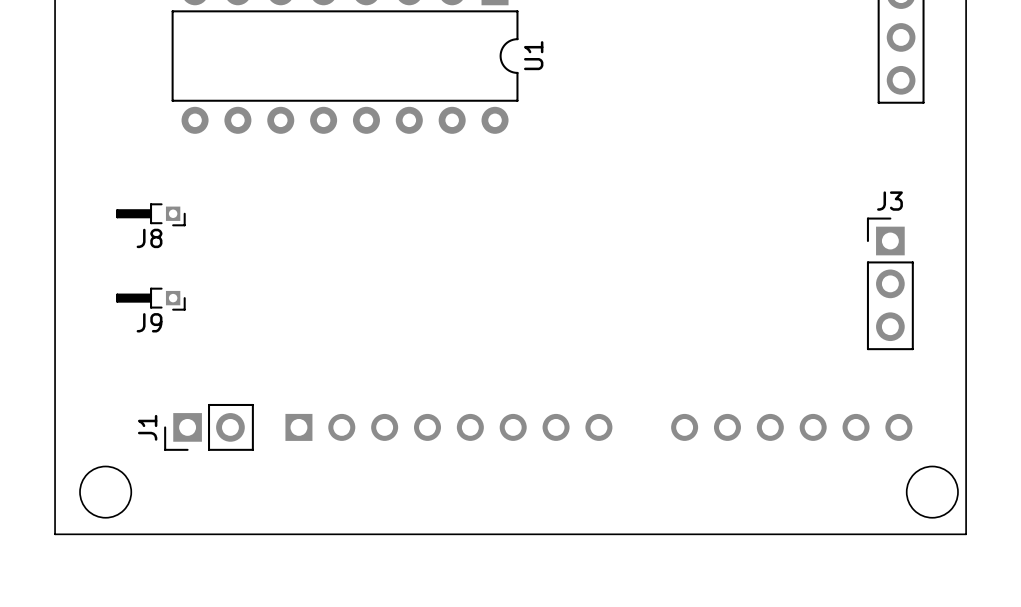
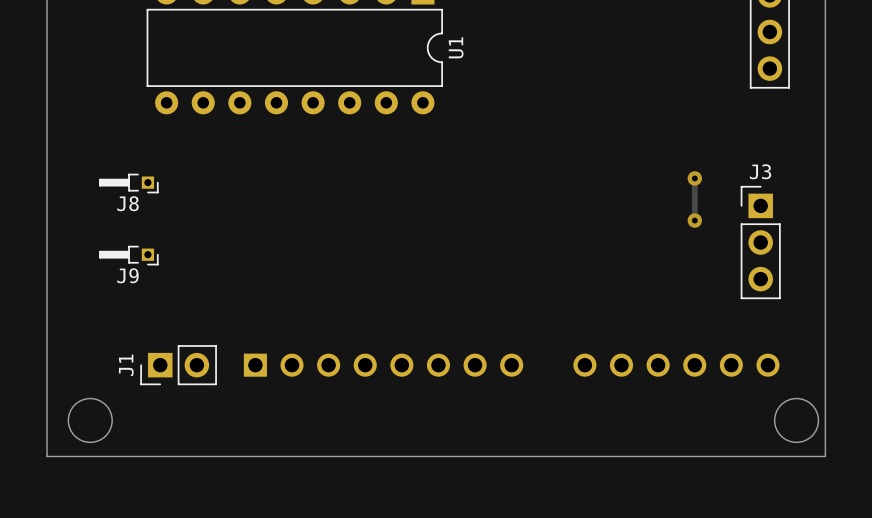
track: none -> (694, 178) (694, 220)
via: none -> (694, 178)
via: none -> (694, 220)

